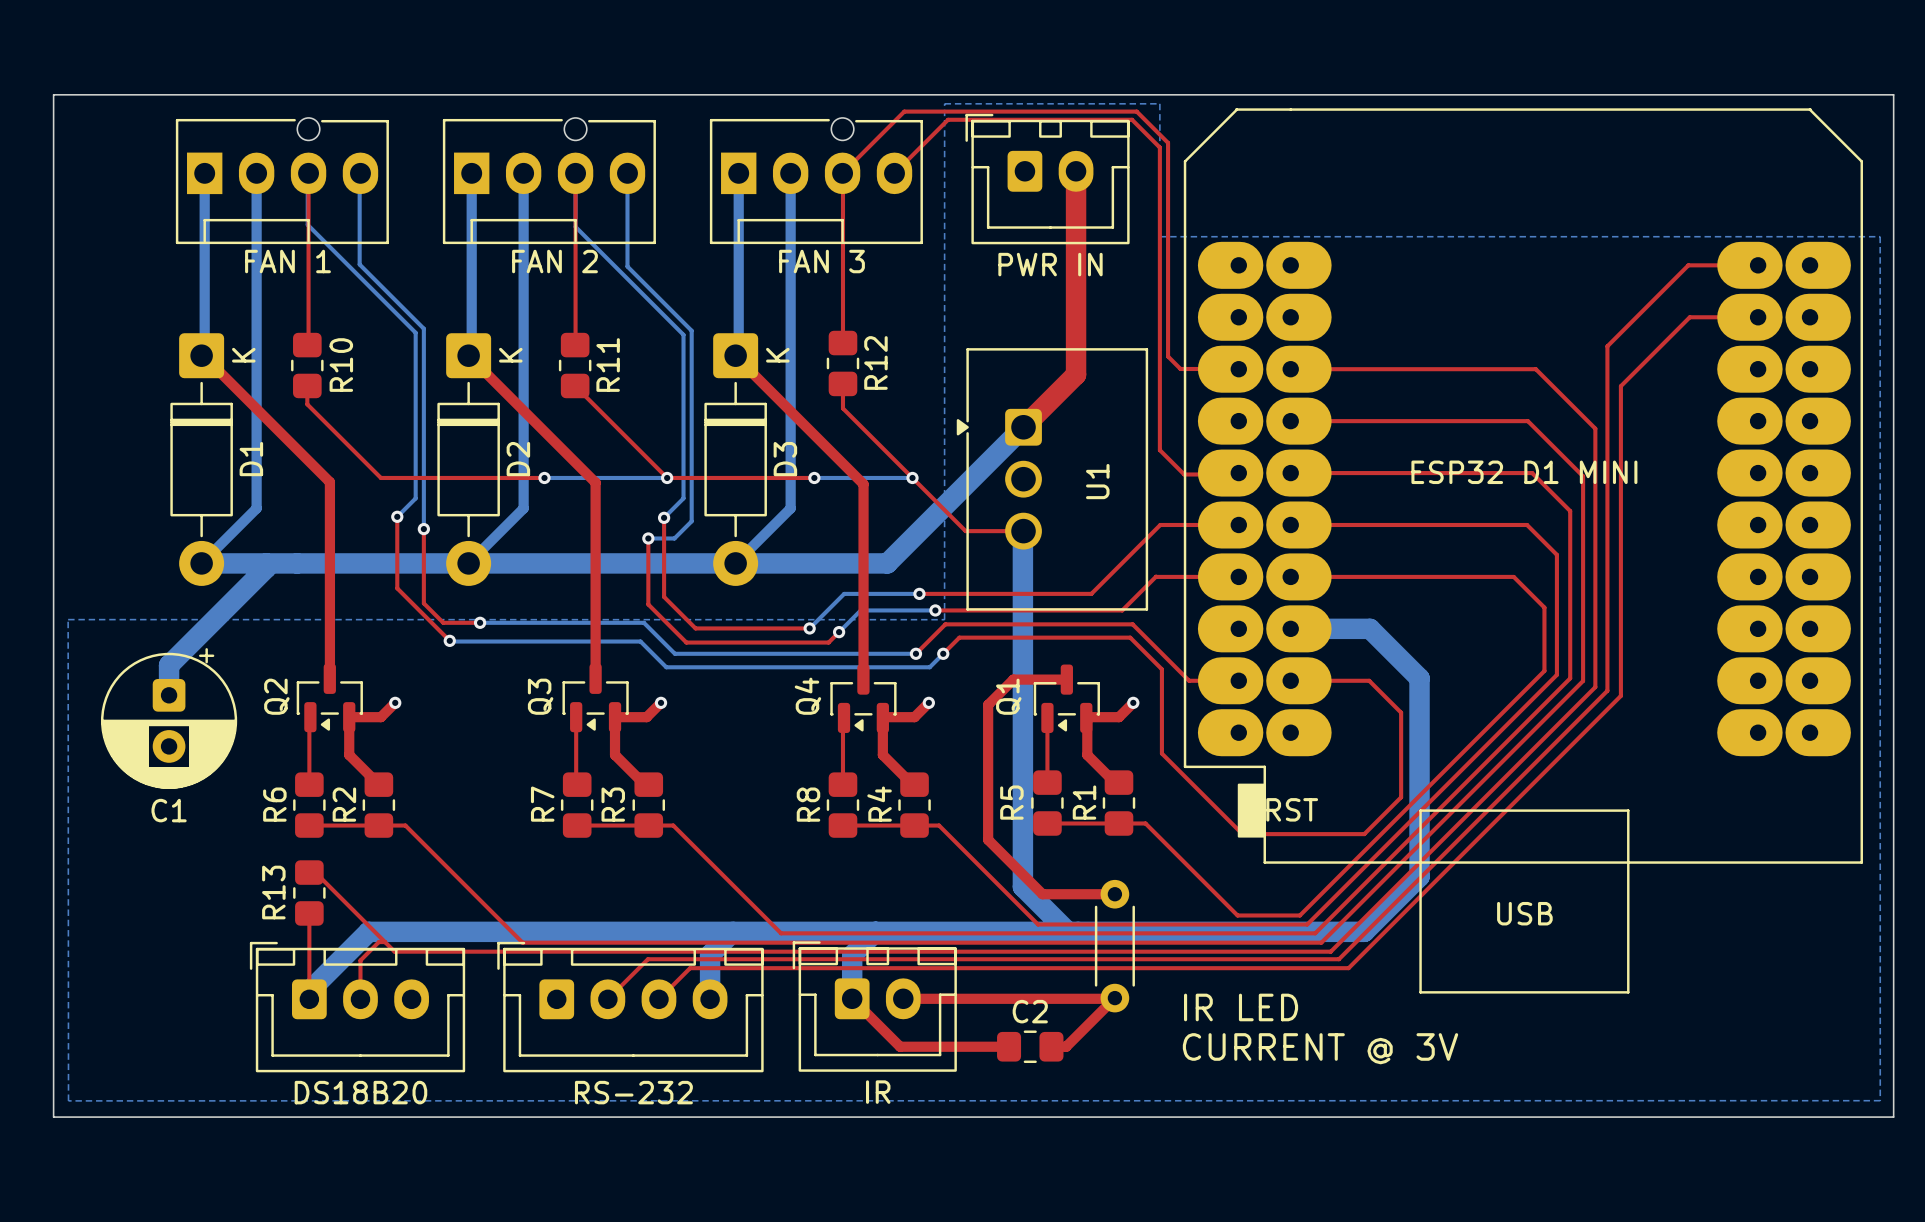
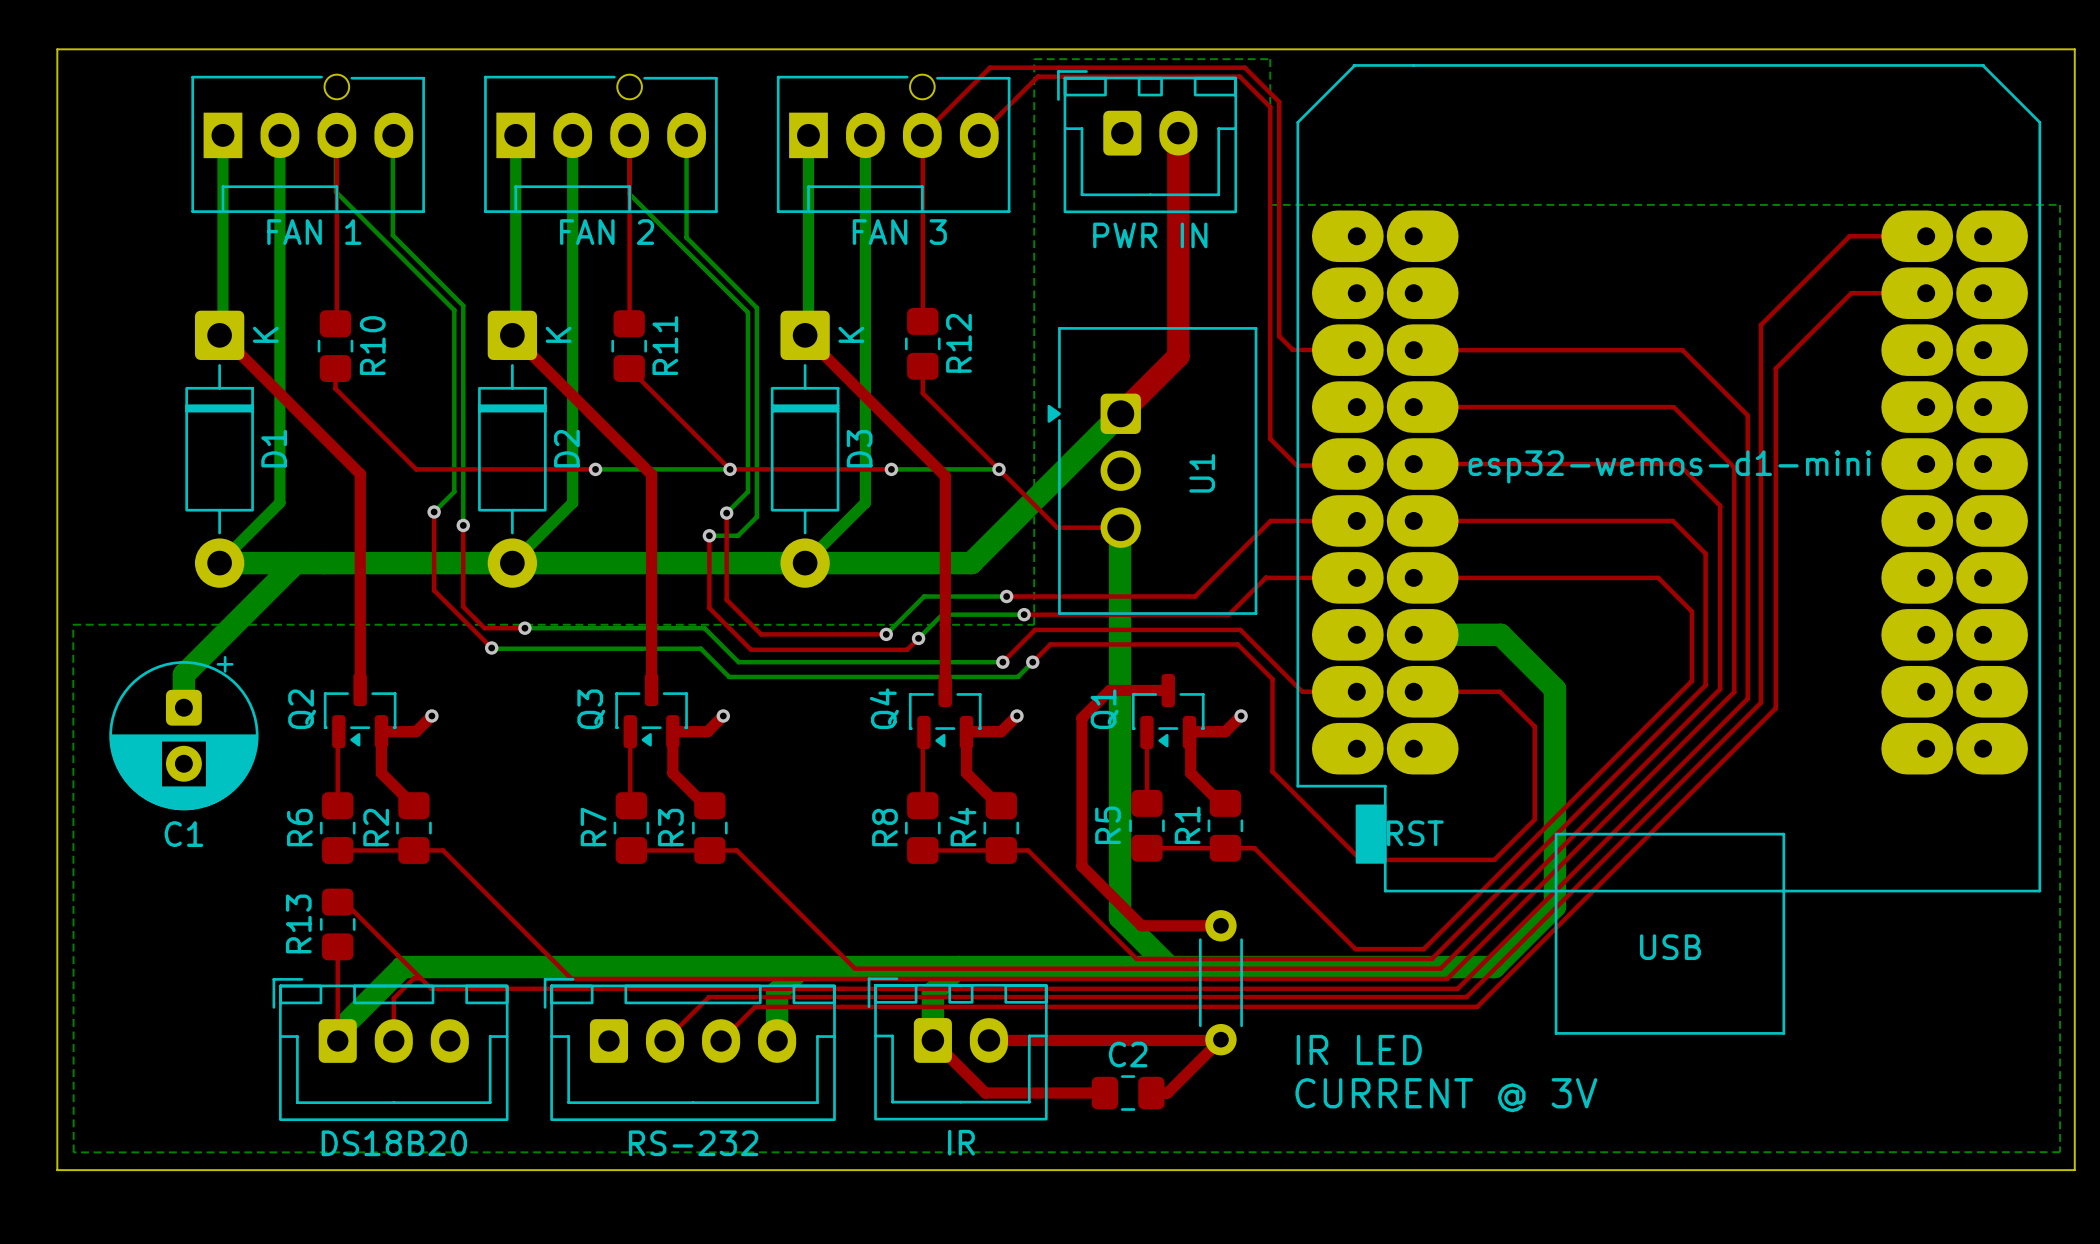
part value: ESP32 D1 MINI (1524, 472) -> esp32-wemos-d1-mini (1669, 466)

